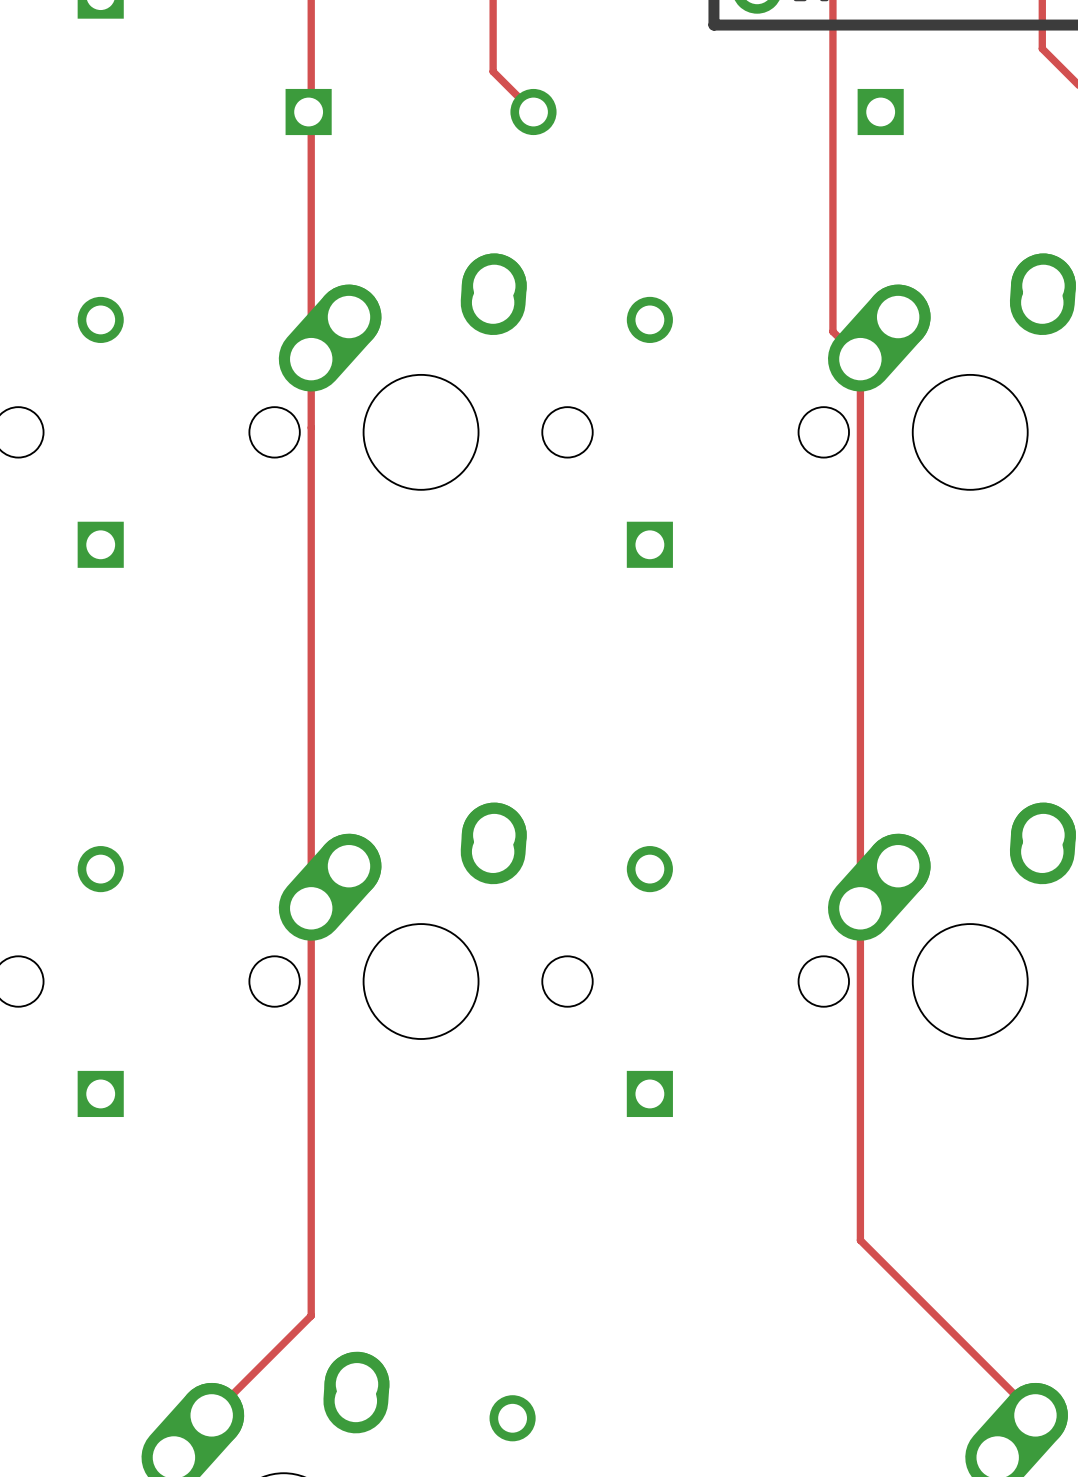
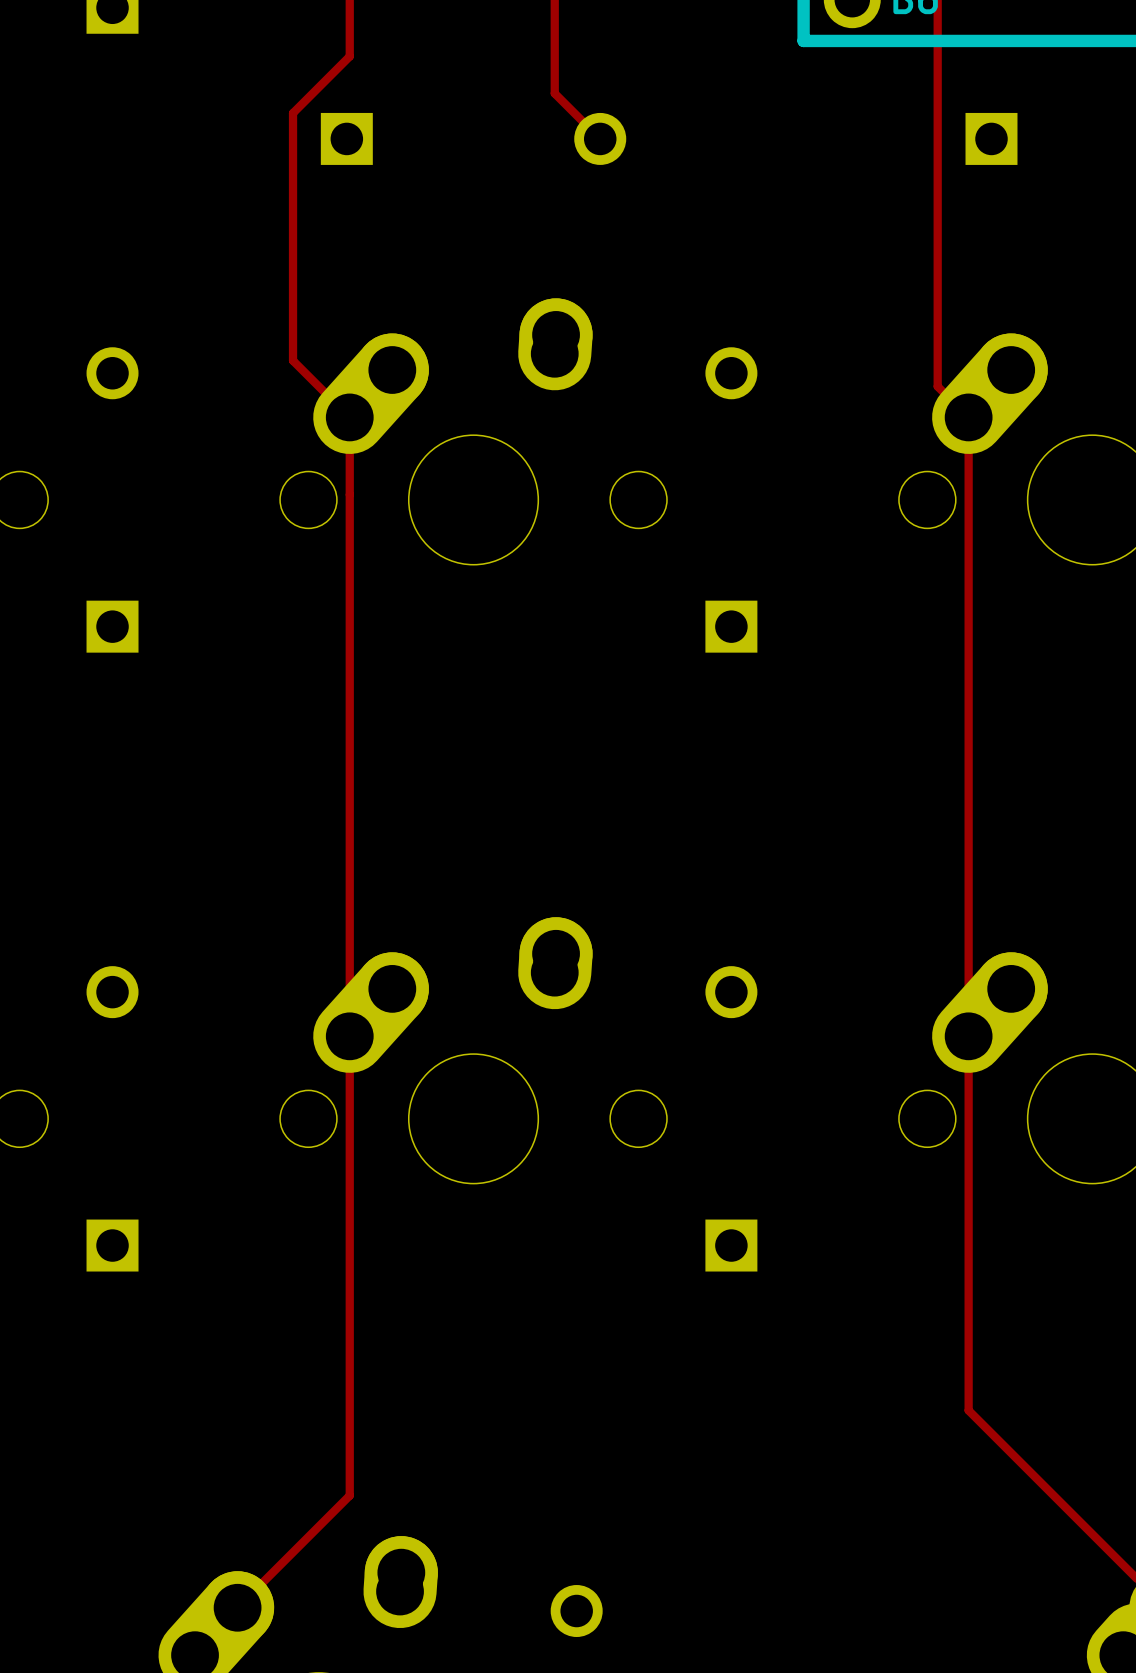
track: (311, 38) (311, 359) -> (349, 56) (293, 113) (293, 360) (349, 417)

